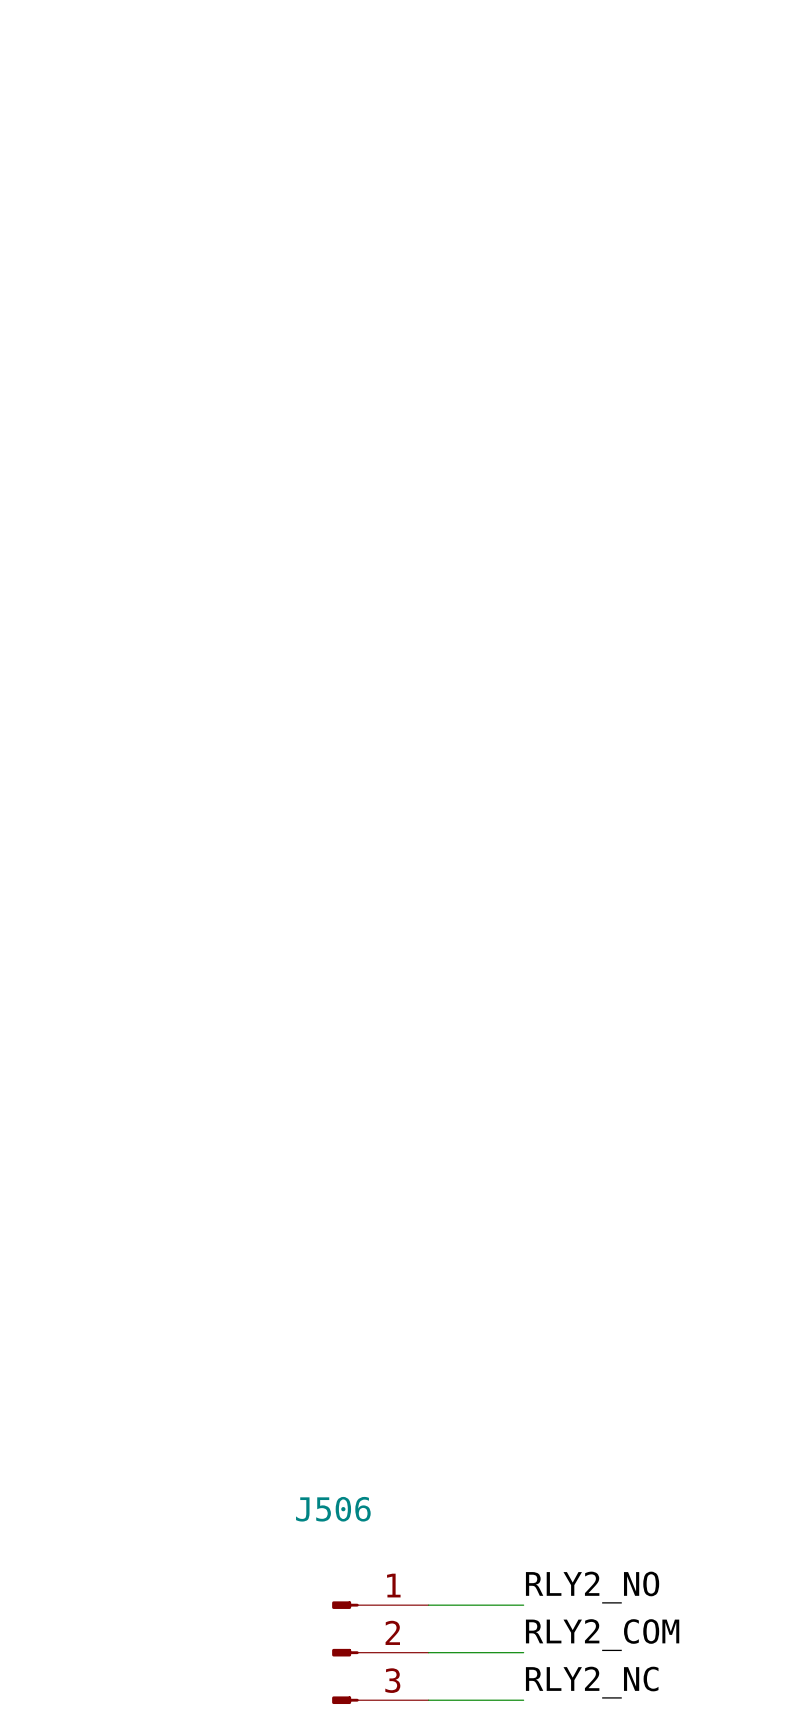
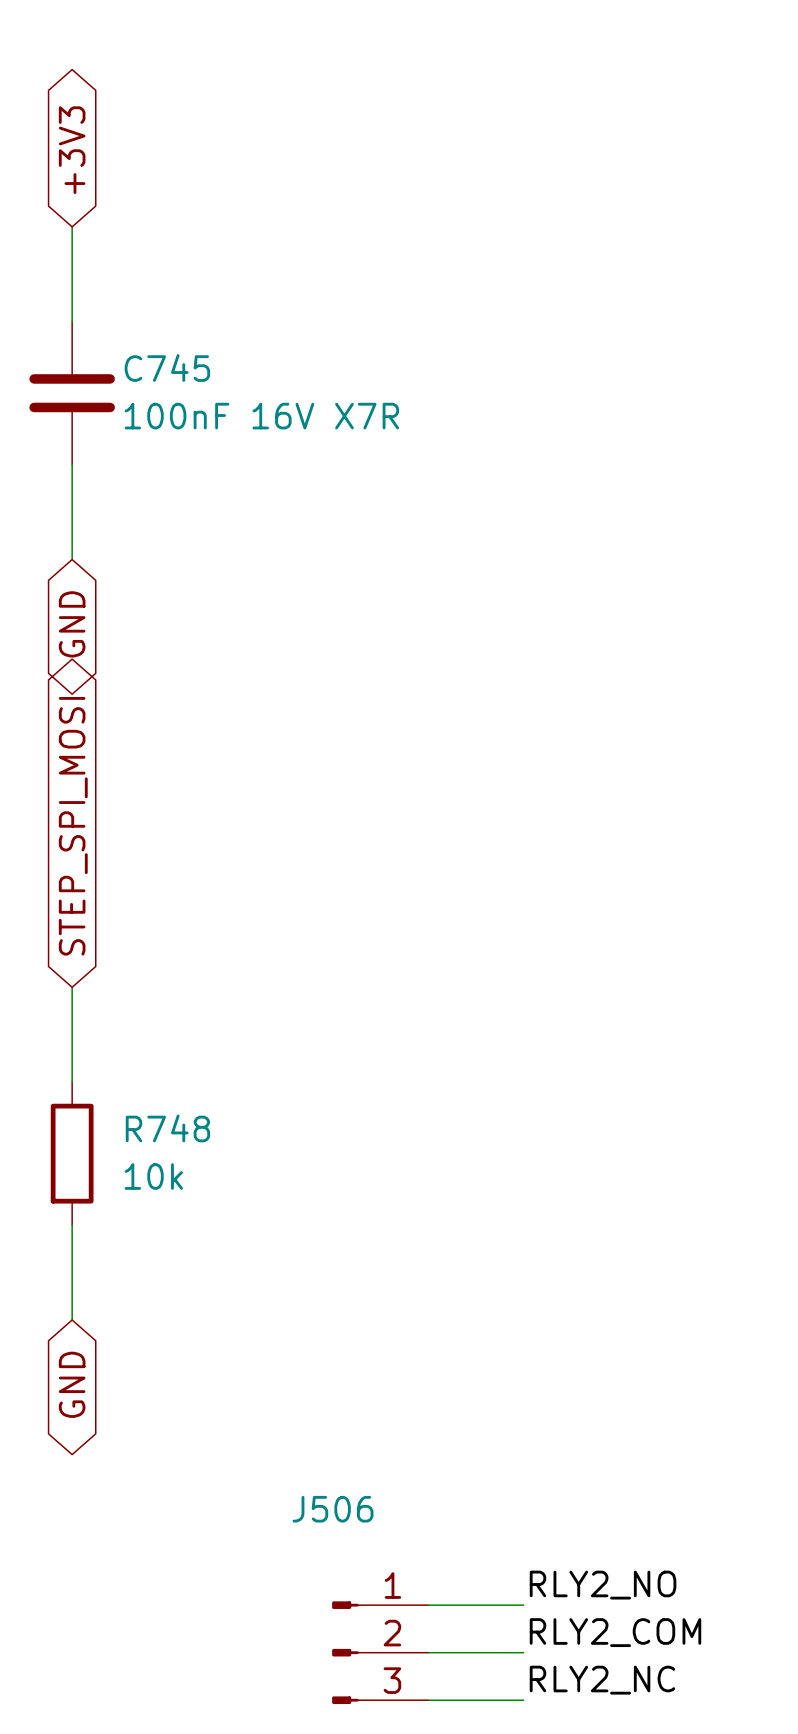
global label: none -> +3V3 (72, 150)
wire: none -> (72, 226) (72, 321)
C745: none -> 100nF 16V X7R (72, 393)
wire: none -> (72, 464) (72, 559)
global label: none -> GND (72, 624)
global label: none -> STEP_SPI_MOSI (73, 826)
wire: none -> (72, 987) (72, 1082)
R748: none -> 10k (72, 1153)
wire: none -> (72, 1224) (72, 1319)
global label: none -> GND (72, 1384)

